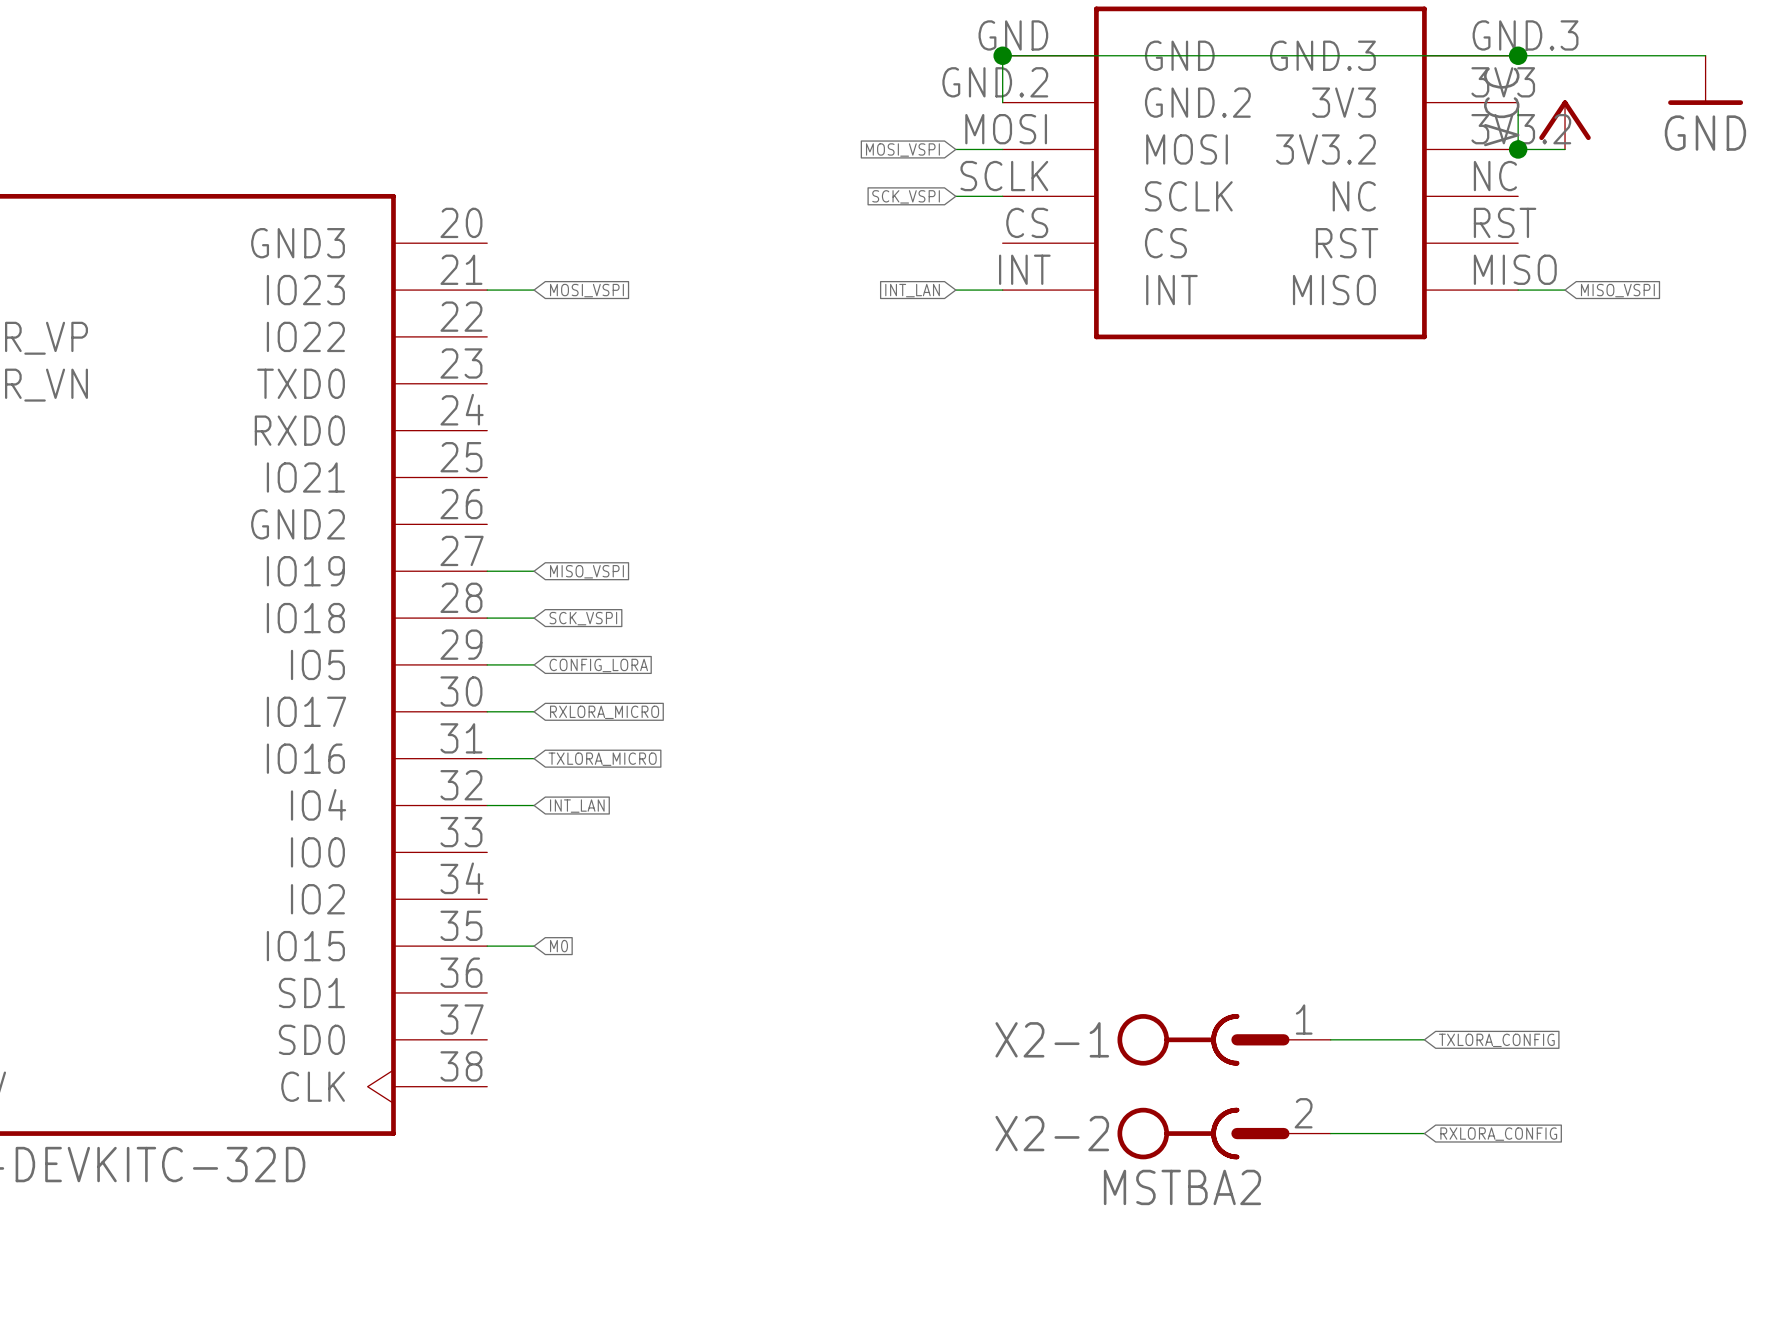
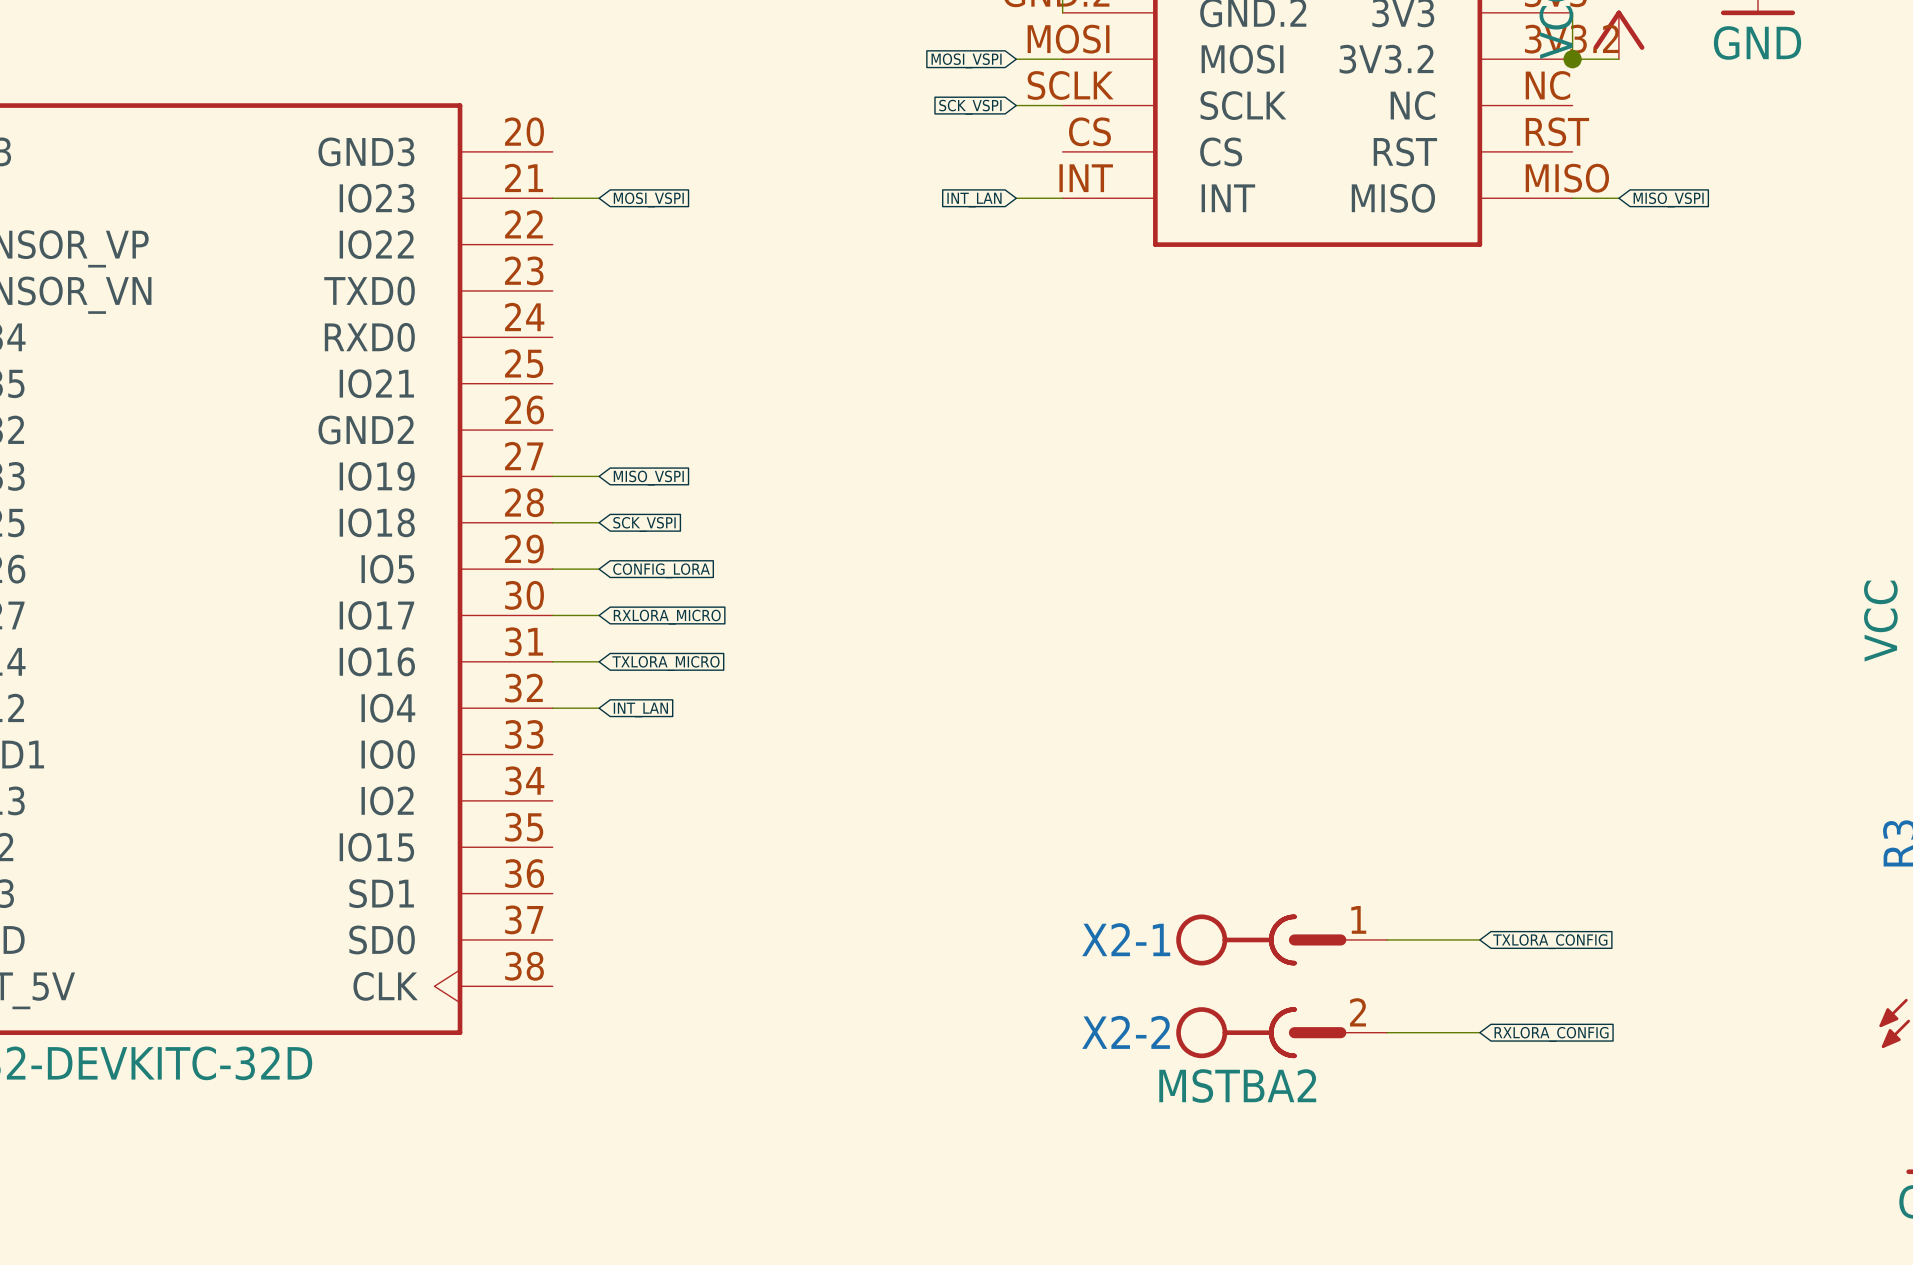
wire: (487, 946) (534, 946) -> none
global label: M0 (559, 946) -> none

